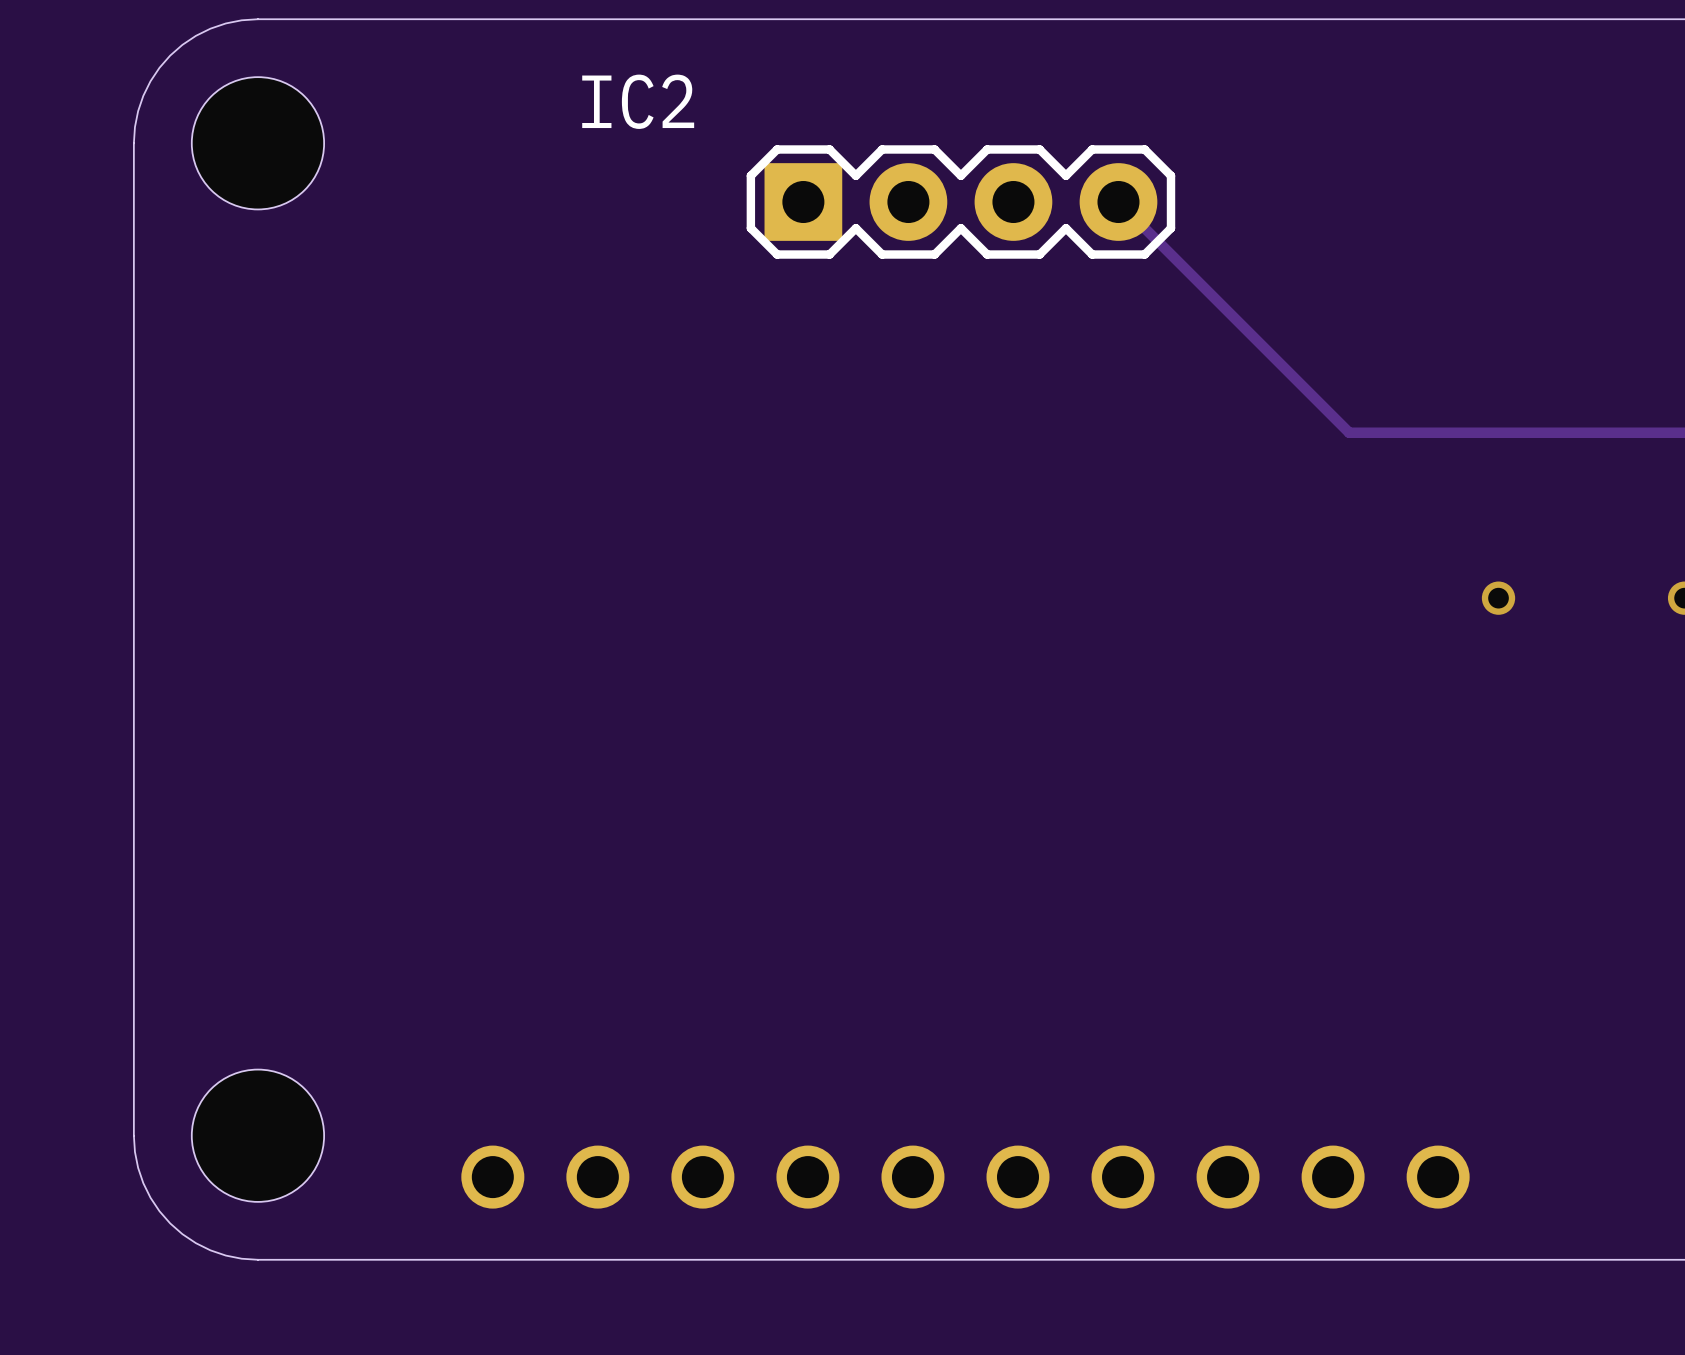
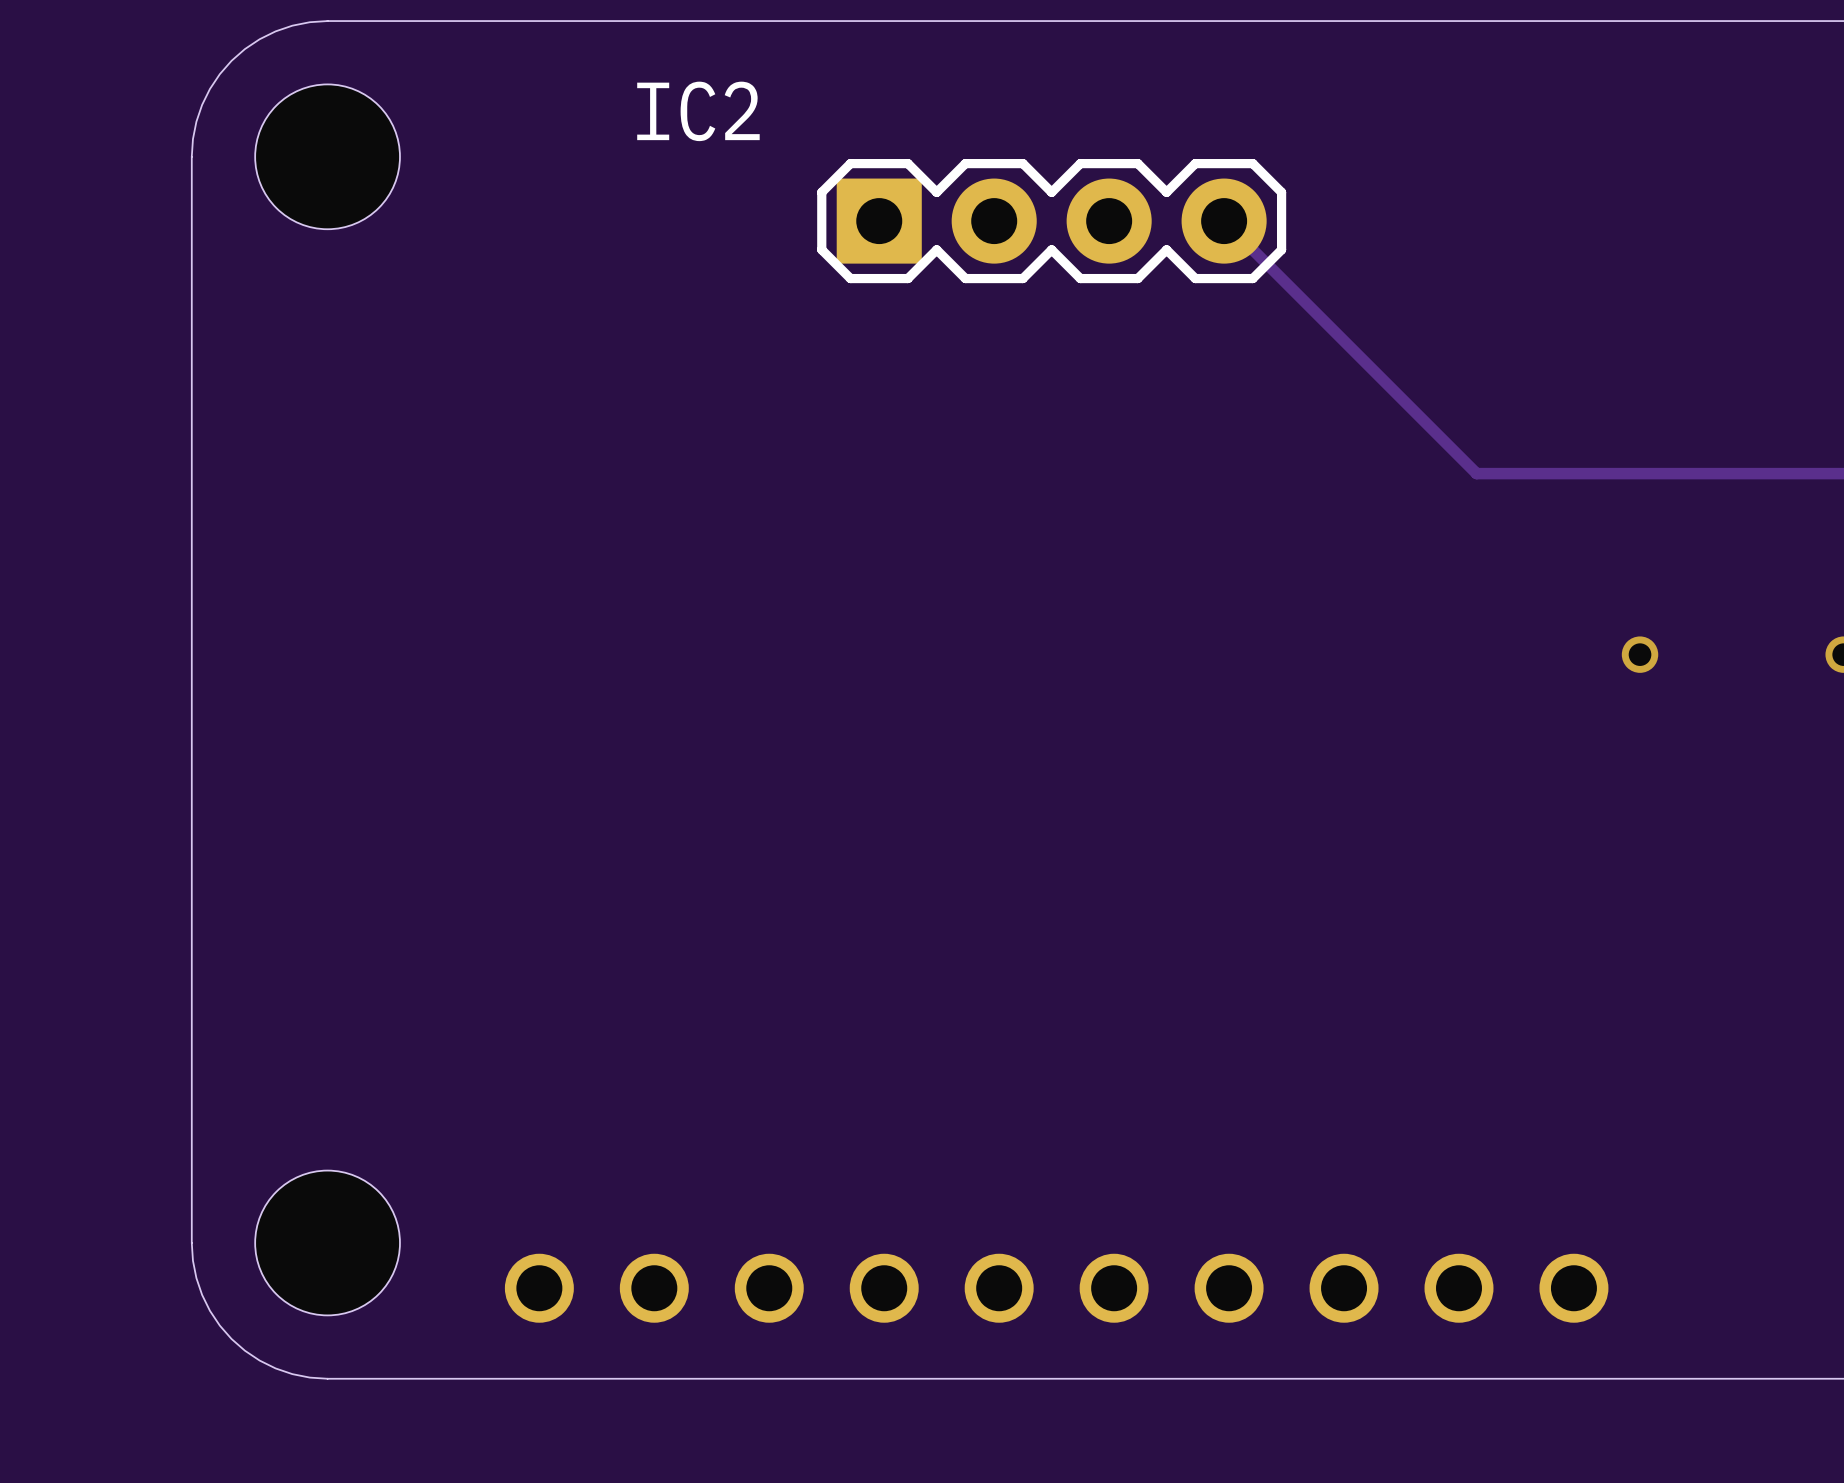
board edge: (299, 19) (257, 19) (225, 23) (195, 35) (182, 44) (159, 67) (150, 81) (138, 111) (133, 143) (134, 1151) (143, 1183) (159, 1211) (182, 1234) (195, 1243) (225, 1255) (241, 1258) (299, 1259) -> (327, 21) (292, 25) (275, 31) (244, 49) (231, 60) (219, 74) (202, 104) (196, 121) (191, 156) (192, 1260) (196, 1278) (209, 1310) (219, 1325) (244, 1350) (259, 1360) (292, 1374) (327, 1378)
hole position: (257, 143) -> (327, 156)
hole position: (257, 1135) -> (327, 1242)

